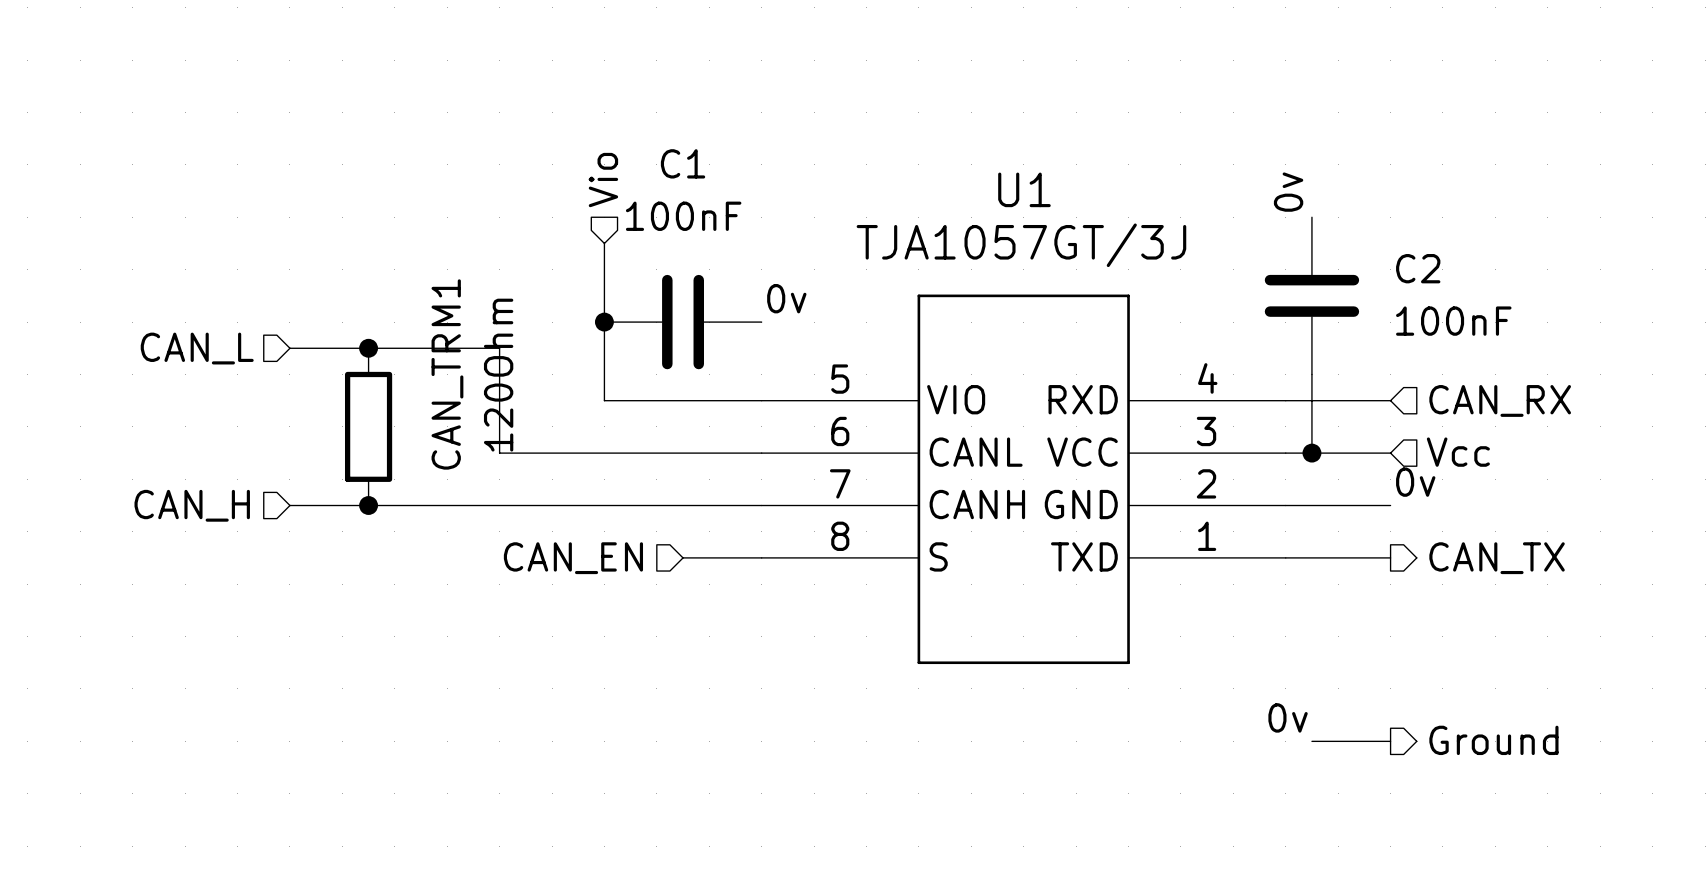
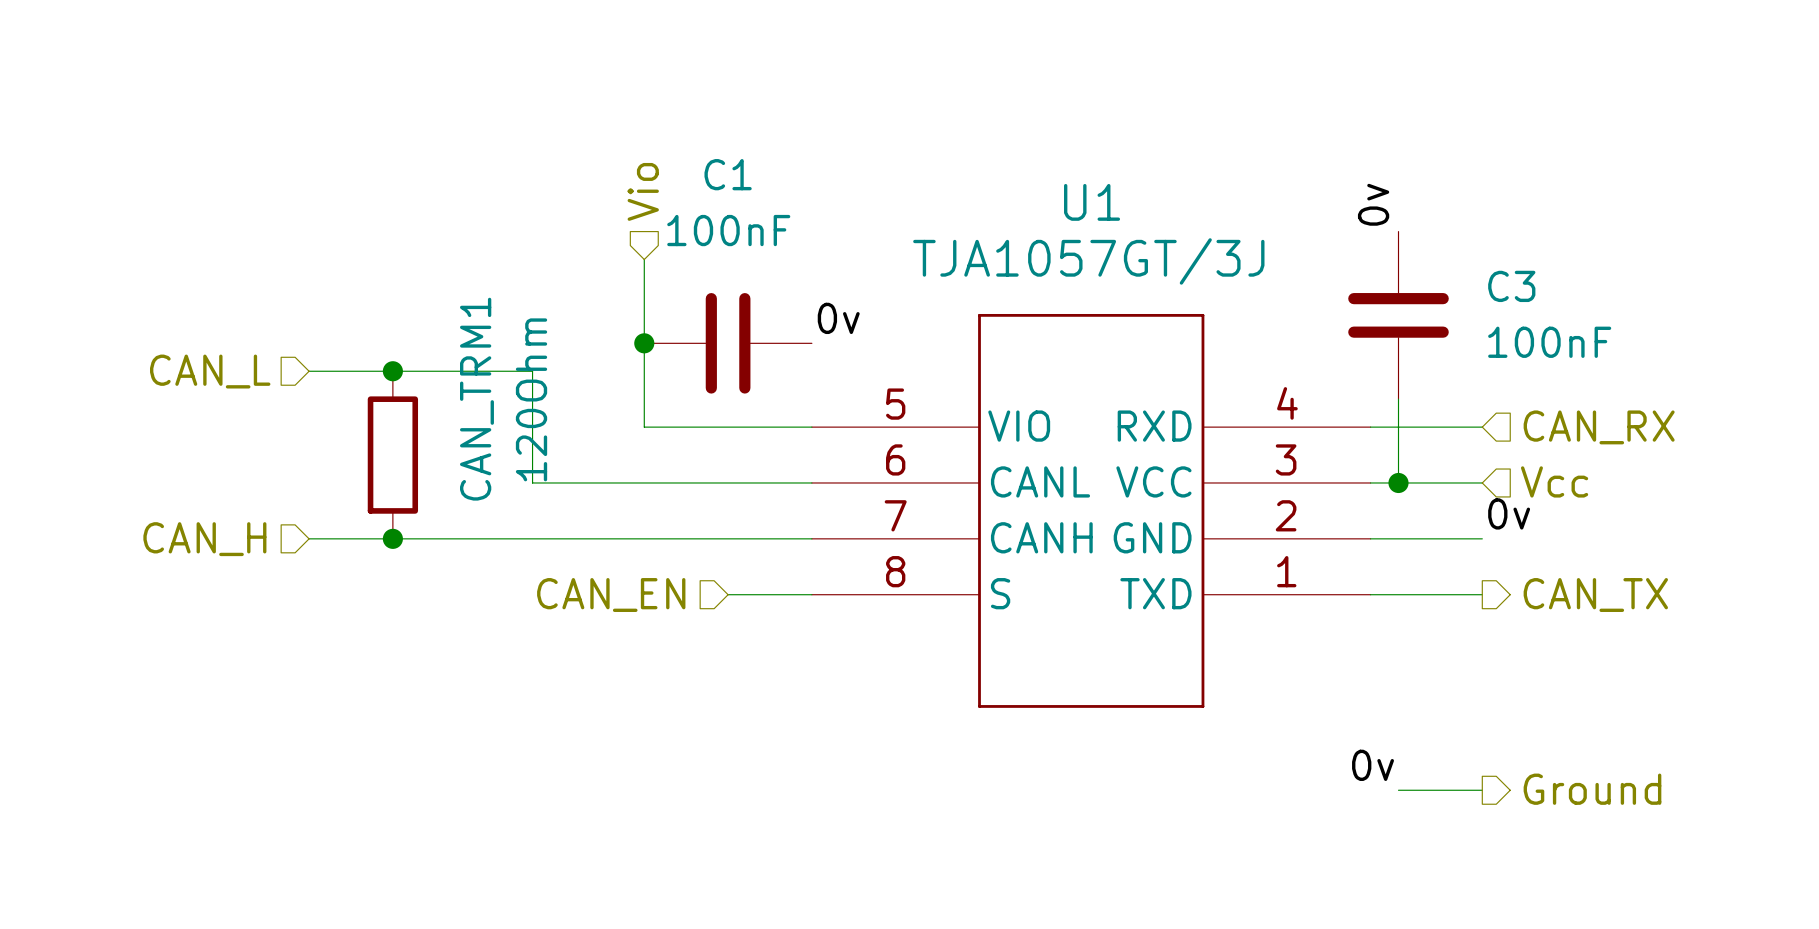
C2 name: C2 (1418, 268) -> C3 (1511, 286)

